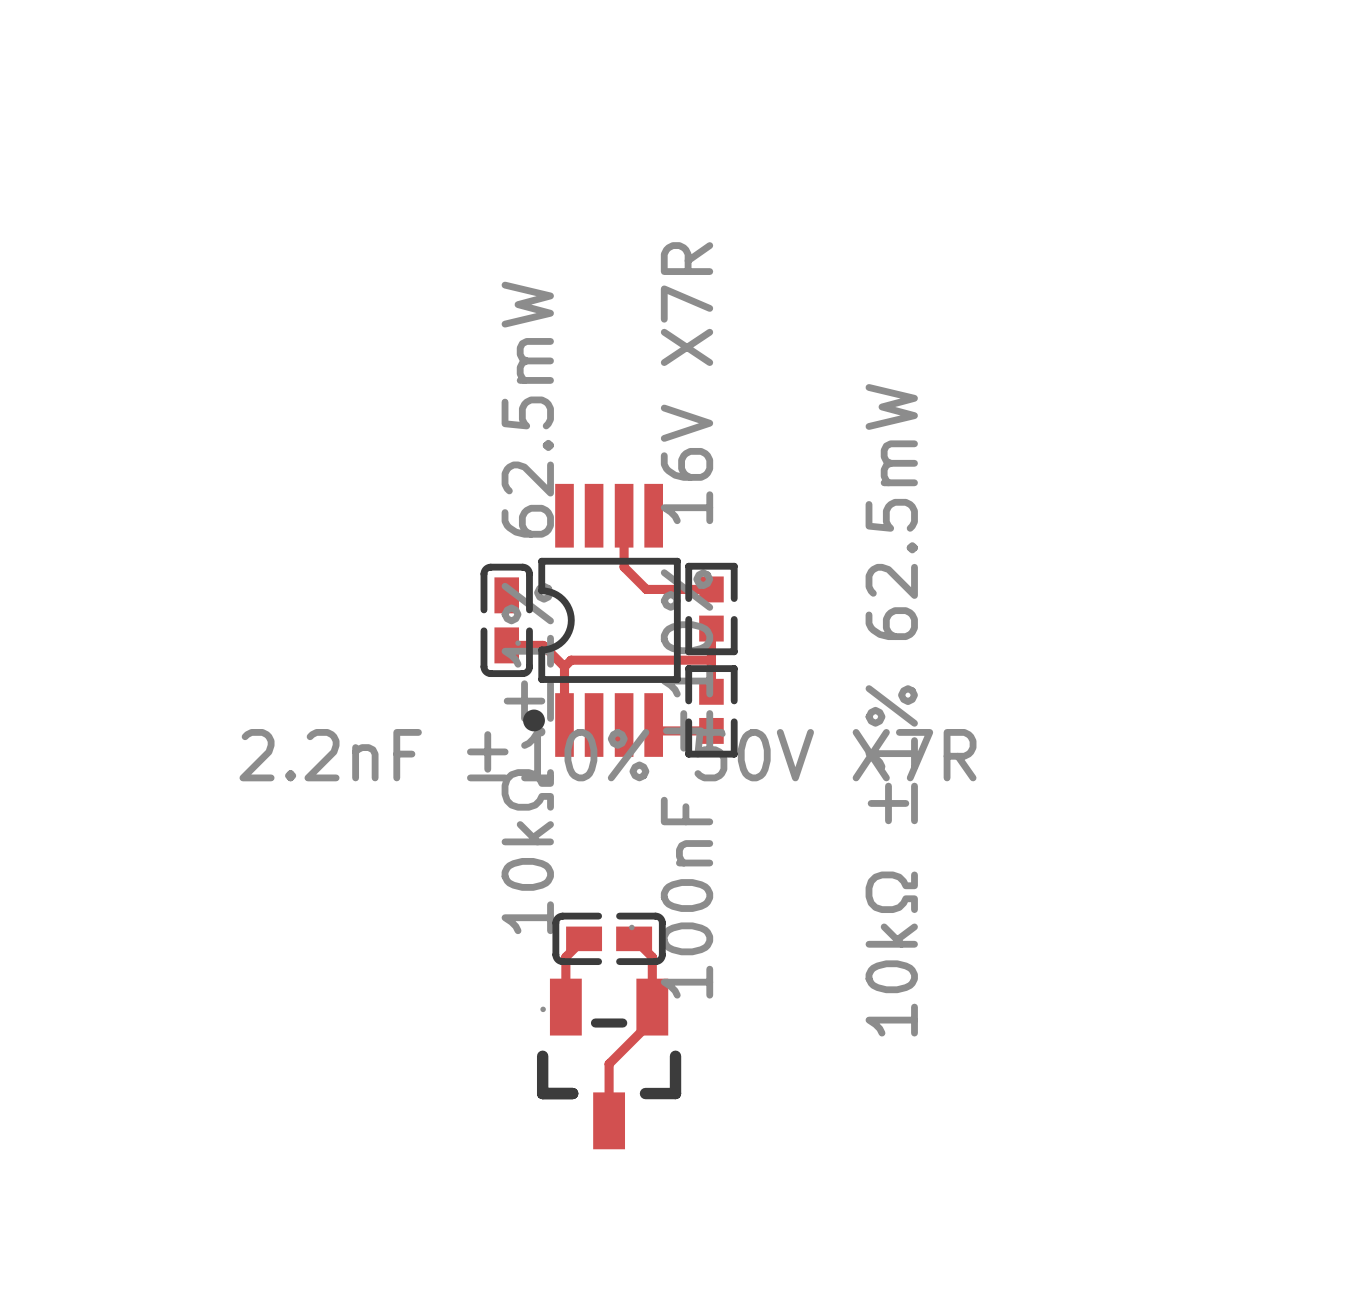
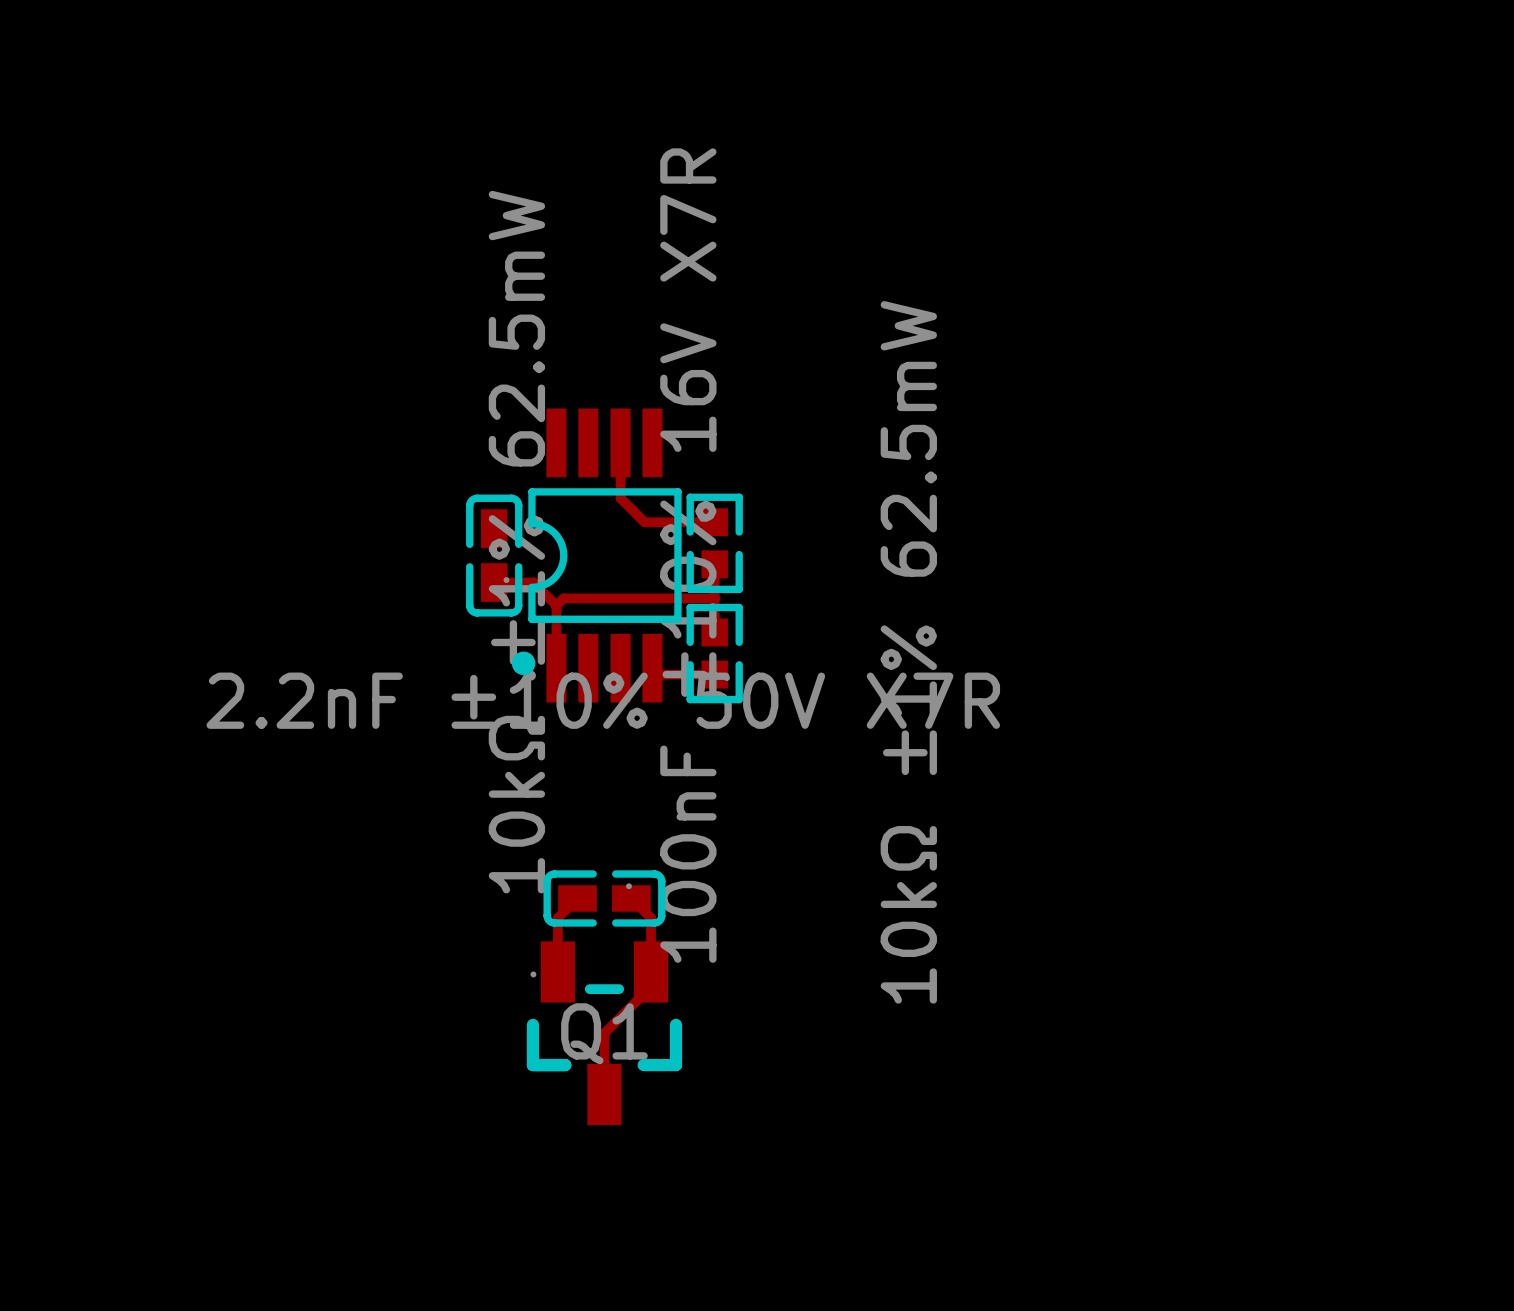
Q1 name: none -> Q1 (604, 1033)

